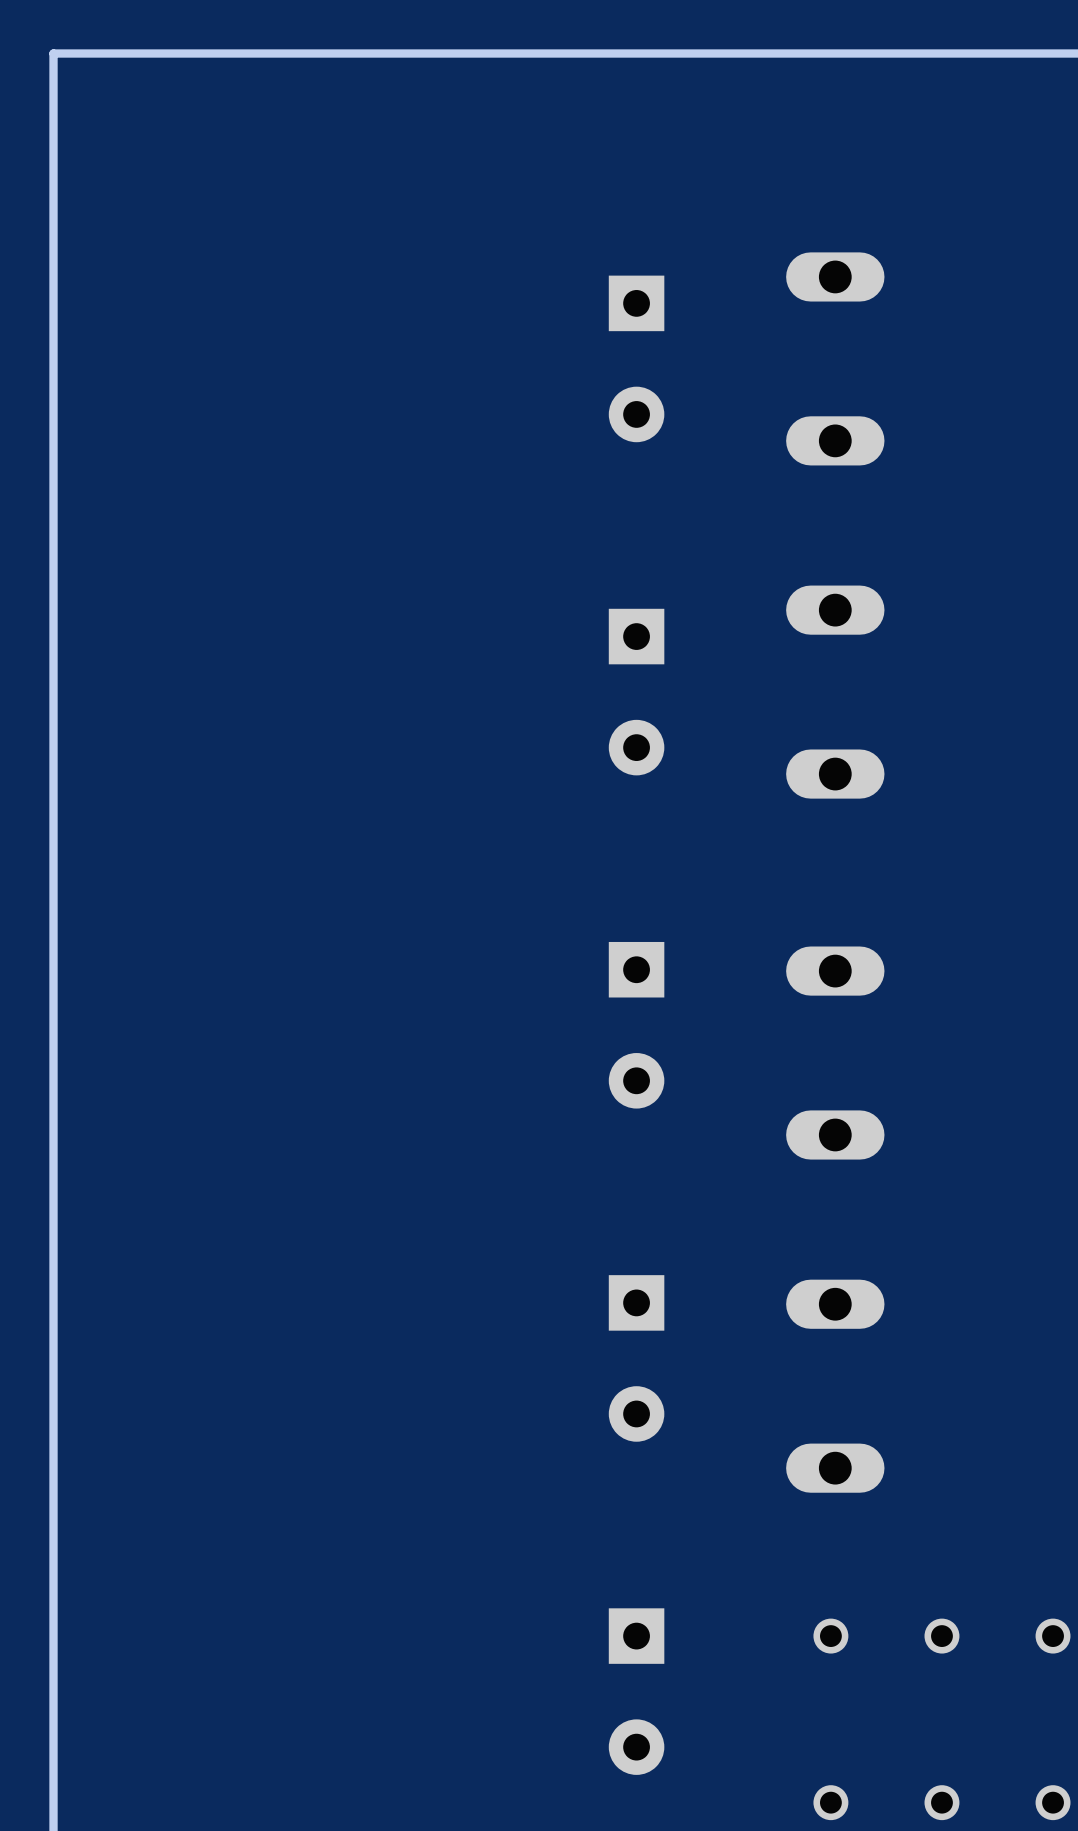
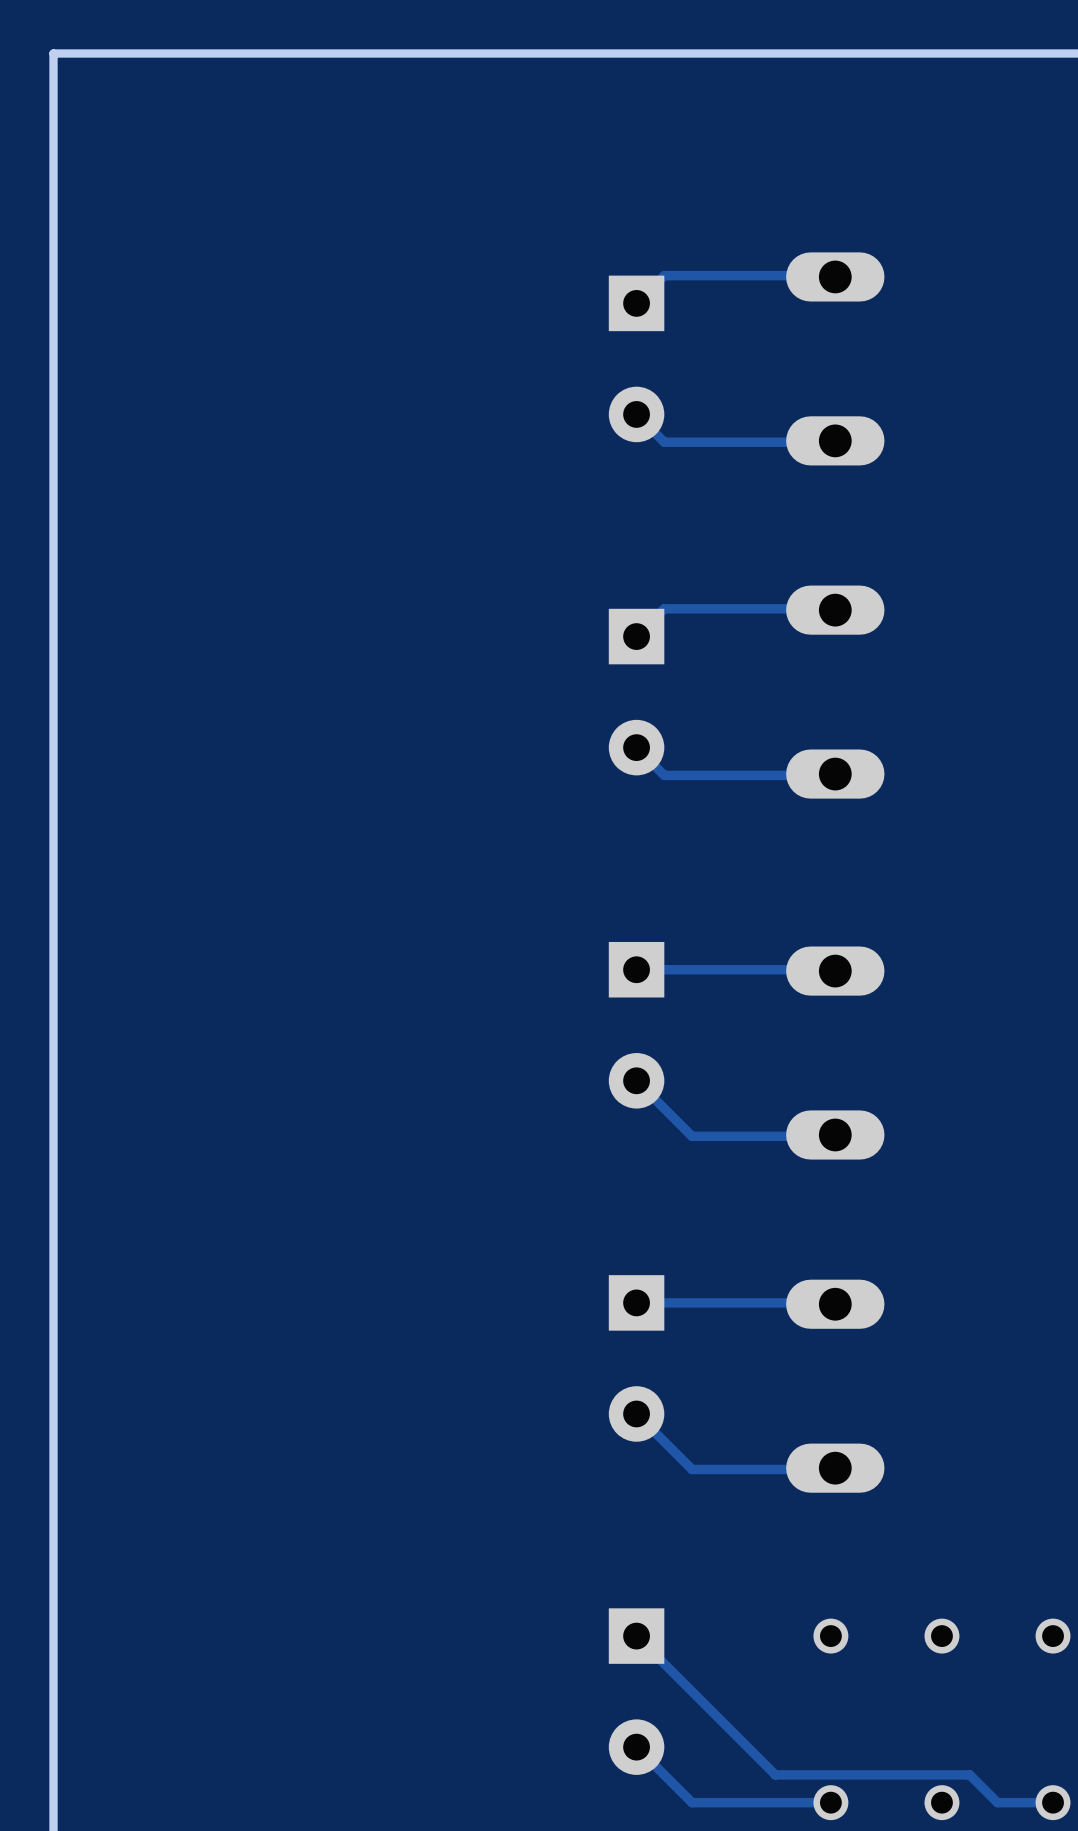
track: none -> (835, 276) (664, 275) (636, 303)
track: none -> (636, 414) (664, 442) (835, 440)
track: none -> (835, 610) (664, 608) (636, 636)
track: none -> (636, 747) (664, 775) (835, 774)
track: none -> (636, 969) (835, 971)
track: none -> (636, 1080) (692, 1136) (835, 1134)
track: none -> (636, 1302) (835, 1304)
track: none -> (636, 1413) (692, 1469) (835, 1468)
track: none -> (636, 1636) (775, 1774) (969, 1774) (997, 1802) (1053, 1802)
track: none -> (636, 1747) (692, 1802) (830, 1802)

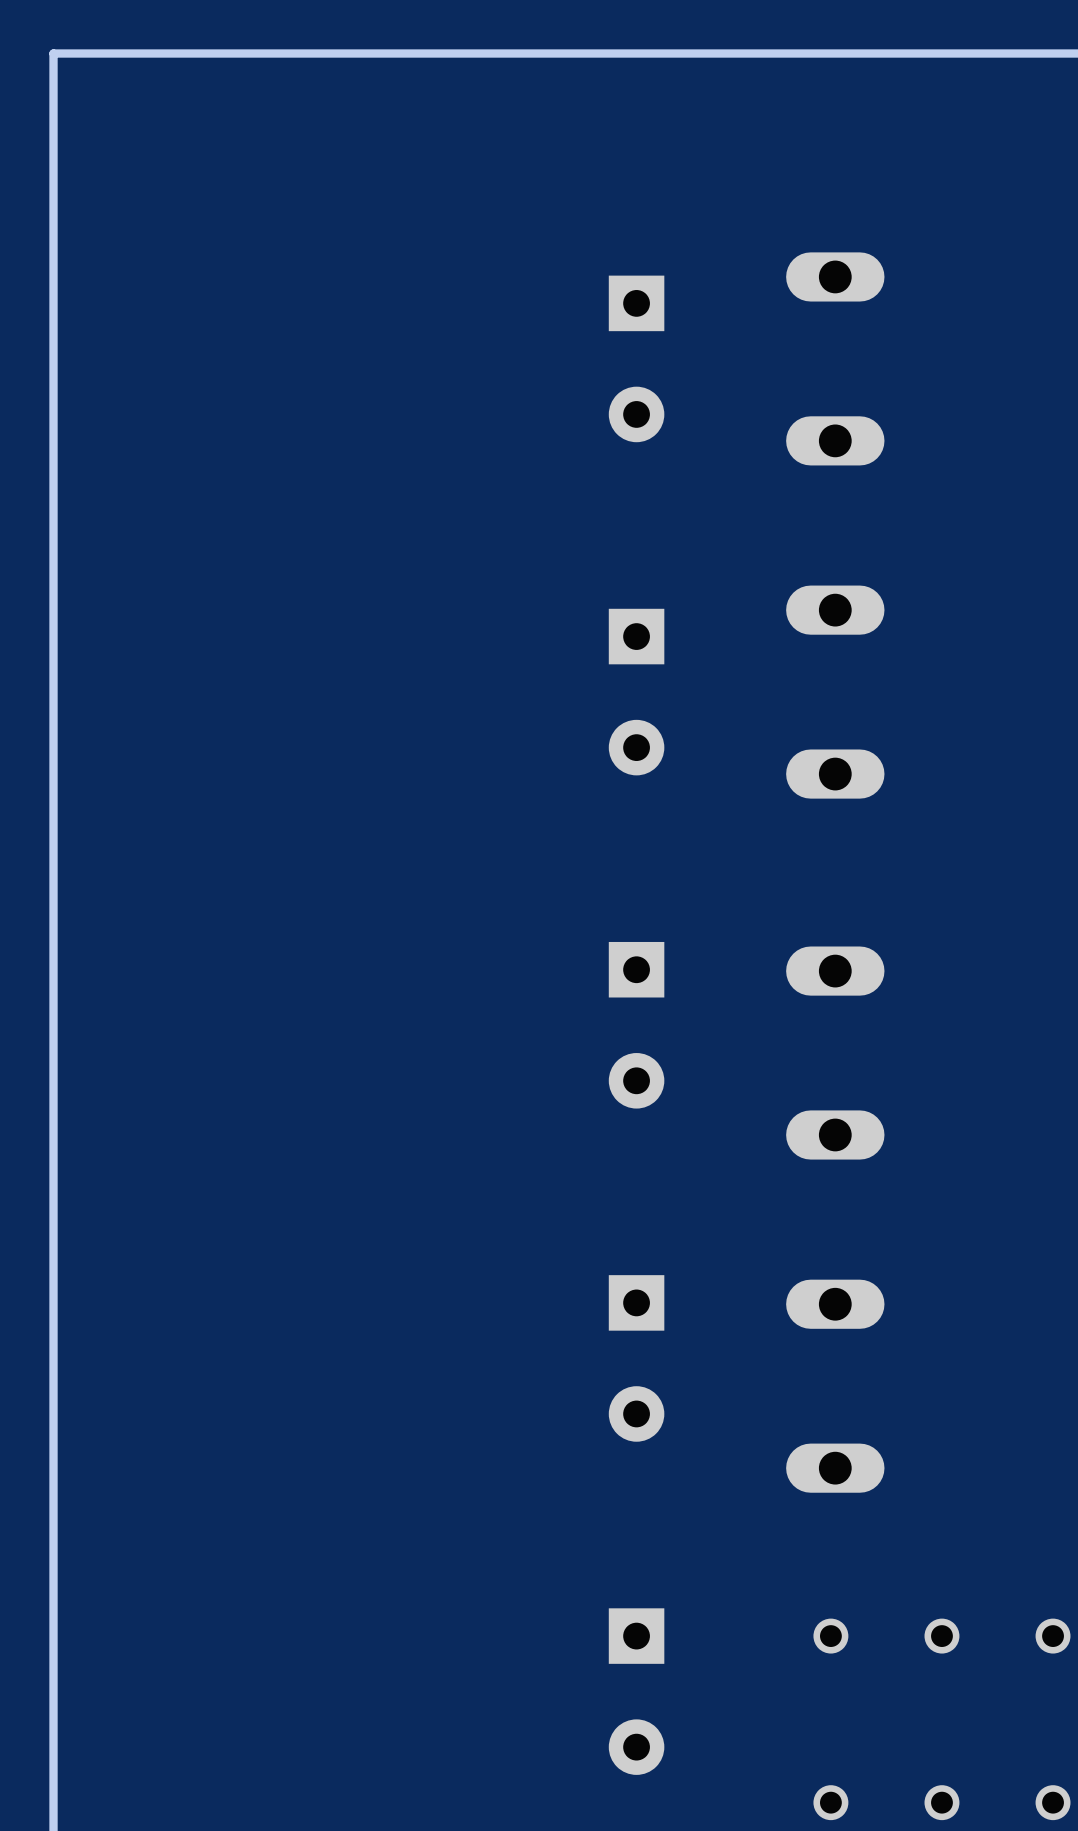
track: (835, 276) (664, 275) (636, 303) -> none
track: (636, 414) (664, 442) (835, 440) -> none
track: (835, 610) (664, 608) (636, 636) -> none
track: (636, 747) (664, 775) (835, 774) -> none
track: (636, 969) (835, 971) -> none
track: (636, 1080) (692, 1136) (835, 1134) -> none
track: (636, 1302) (835, 1304) -> none
track: (636, 1413) (692, 1469) (835, 1468) -> none
track: (636, 1636) (775, 1774) (969, 1774) (997, 1802) (1053, 1802) -> none
track: (636, 1747) (692, 1802) (830, 1802) -> none

